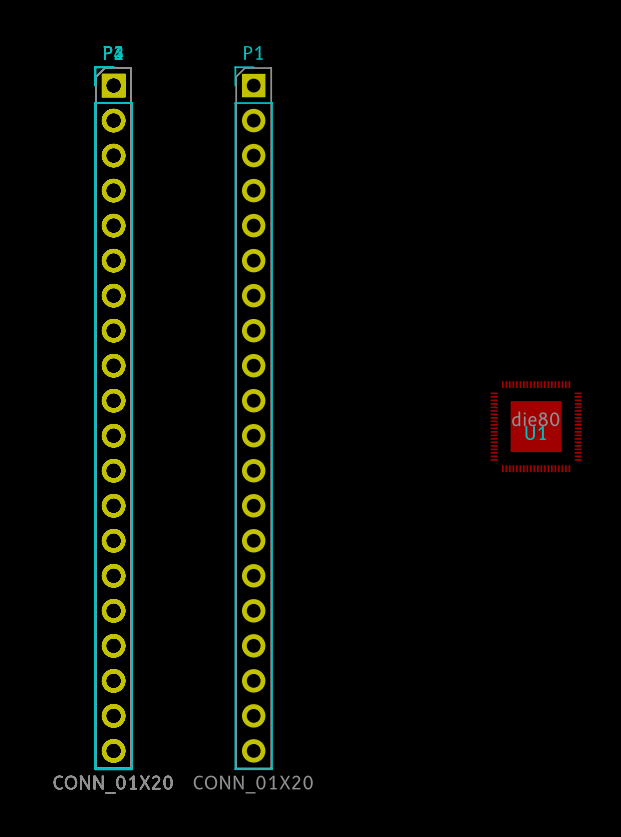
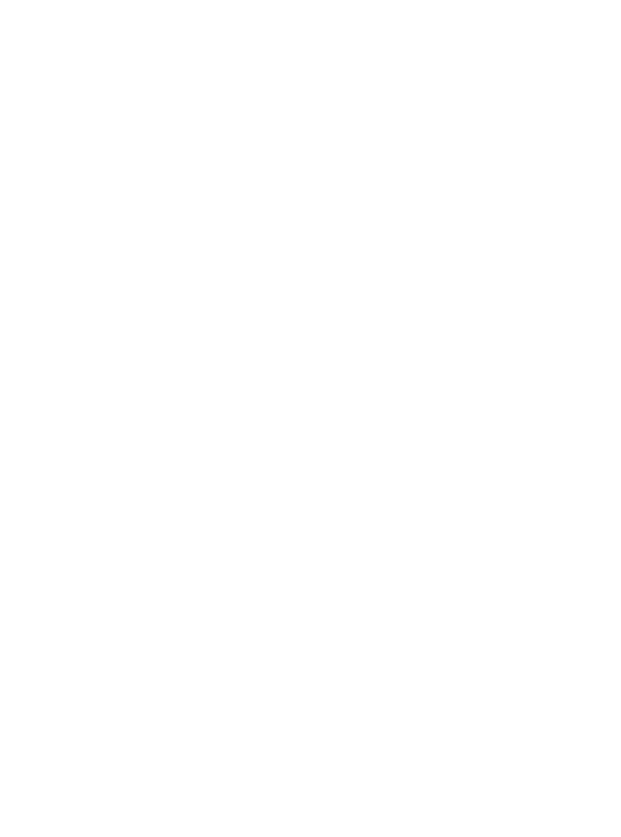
part: CONN_01X20 (113, 418) -> none
part: CONN_01X20 (113, 418) -> none
part: CONN_01X20 (113, 418) -> none
P1: CONN_01X20 (253, 418) -> none
U1: die80 (536, 426) -> none

